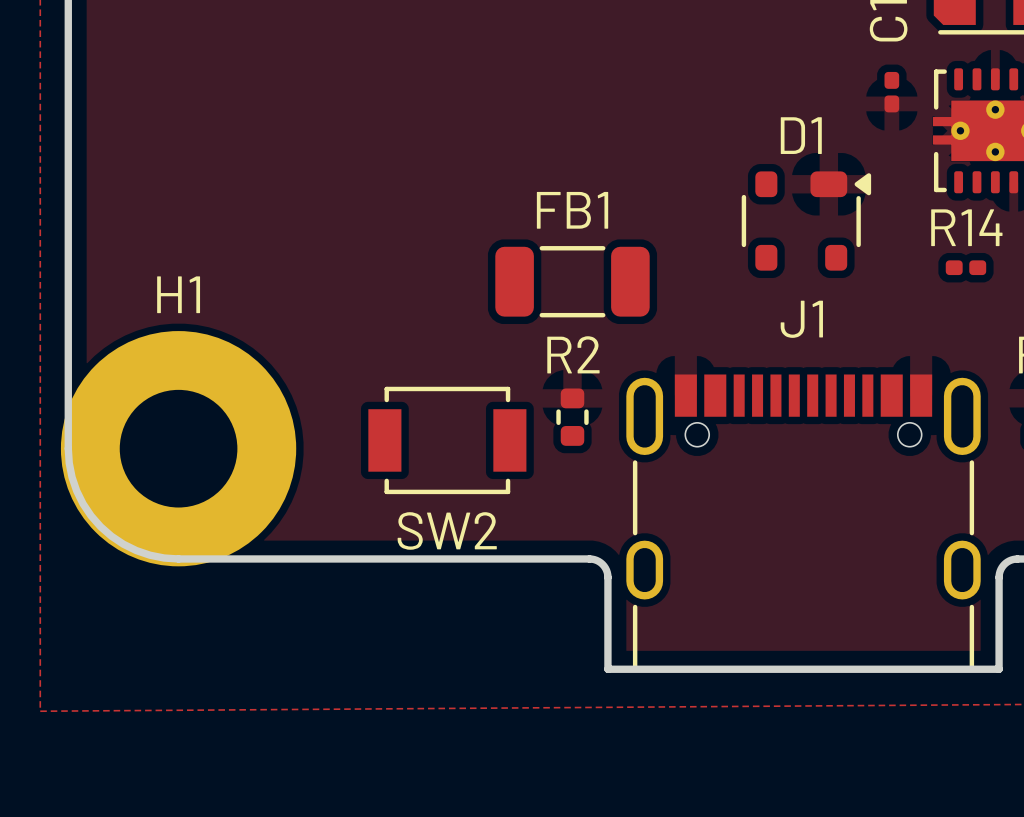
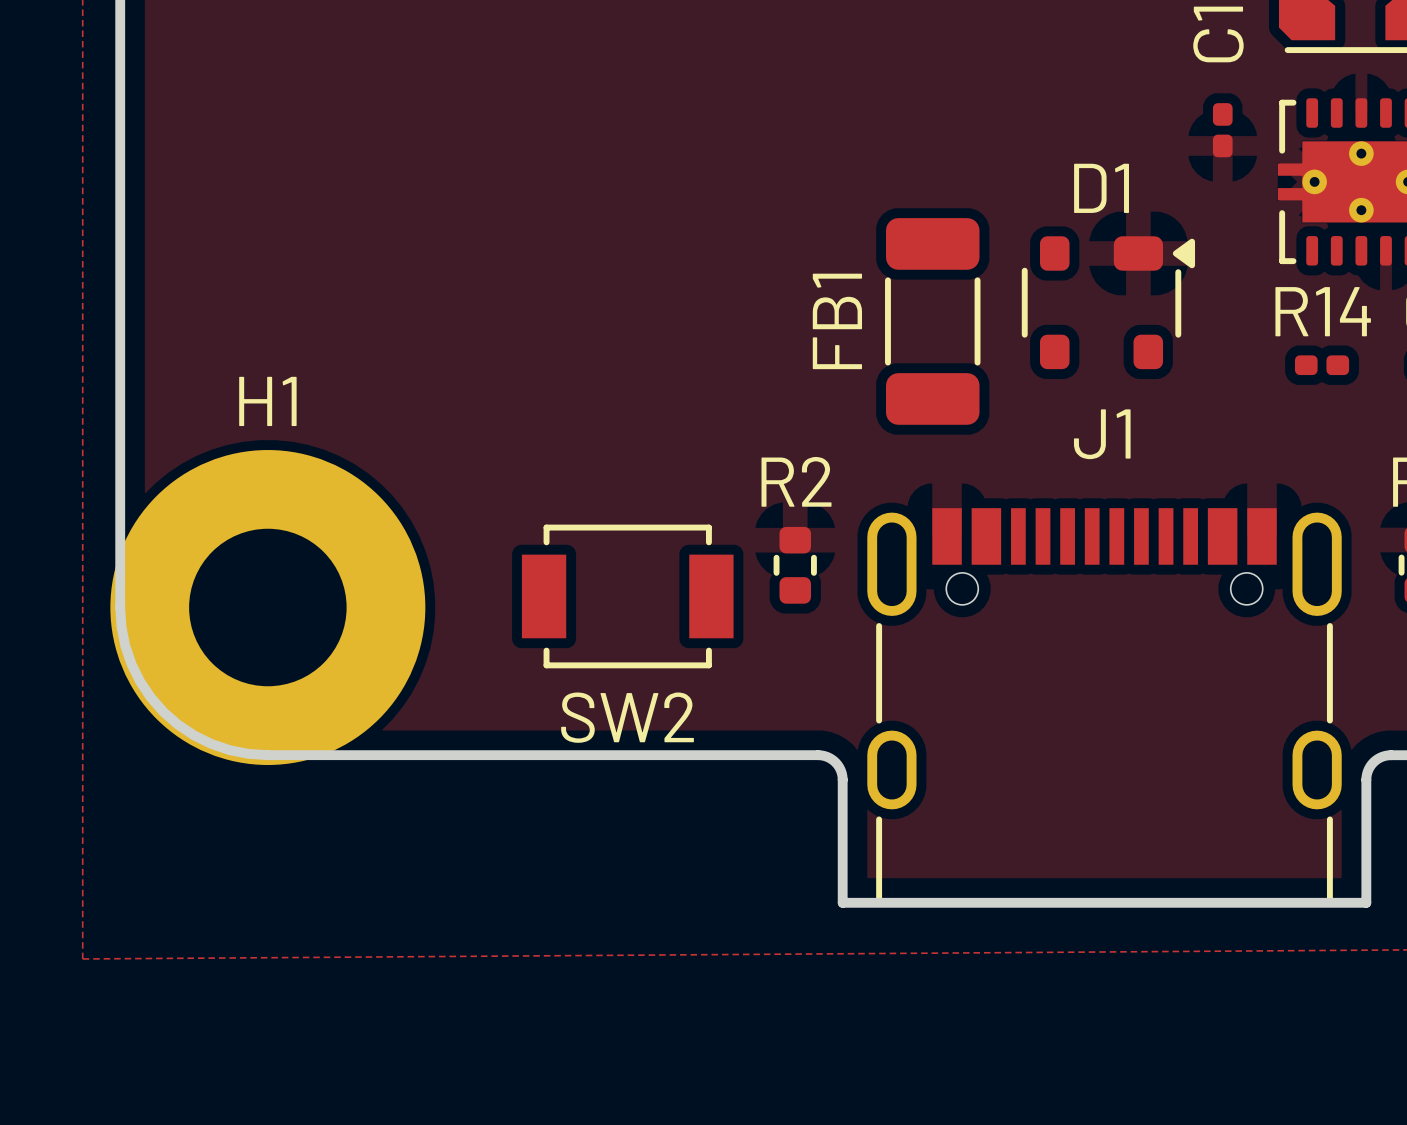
FB1 name position: FB1 (572, 210) -> FB1 (837, 321)
FB1 rotation: 0° (572, 281) -> 90° clockwise (932, 321)
FB1 position: (572, 281) -> (932, 321)

